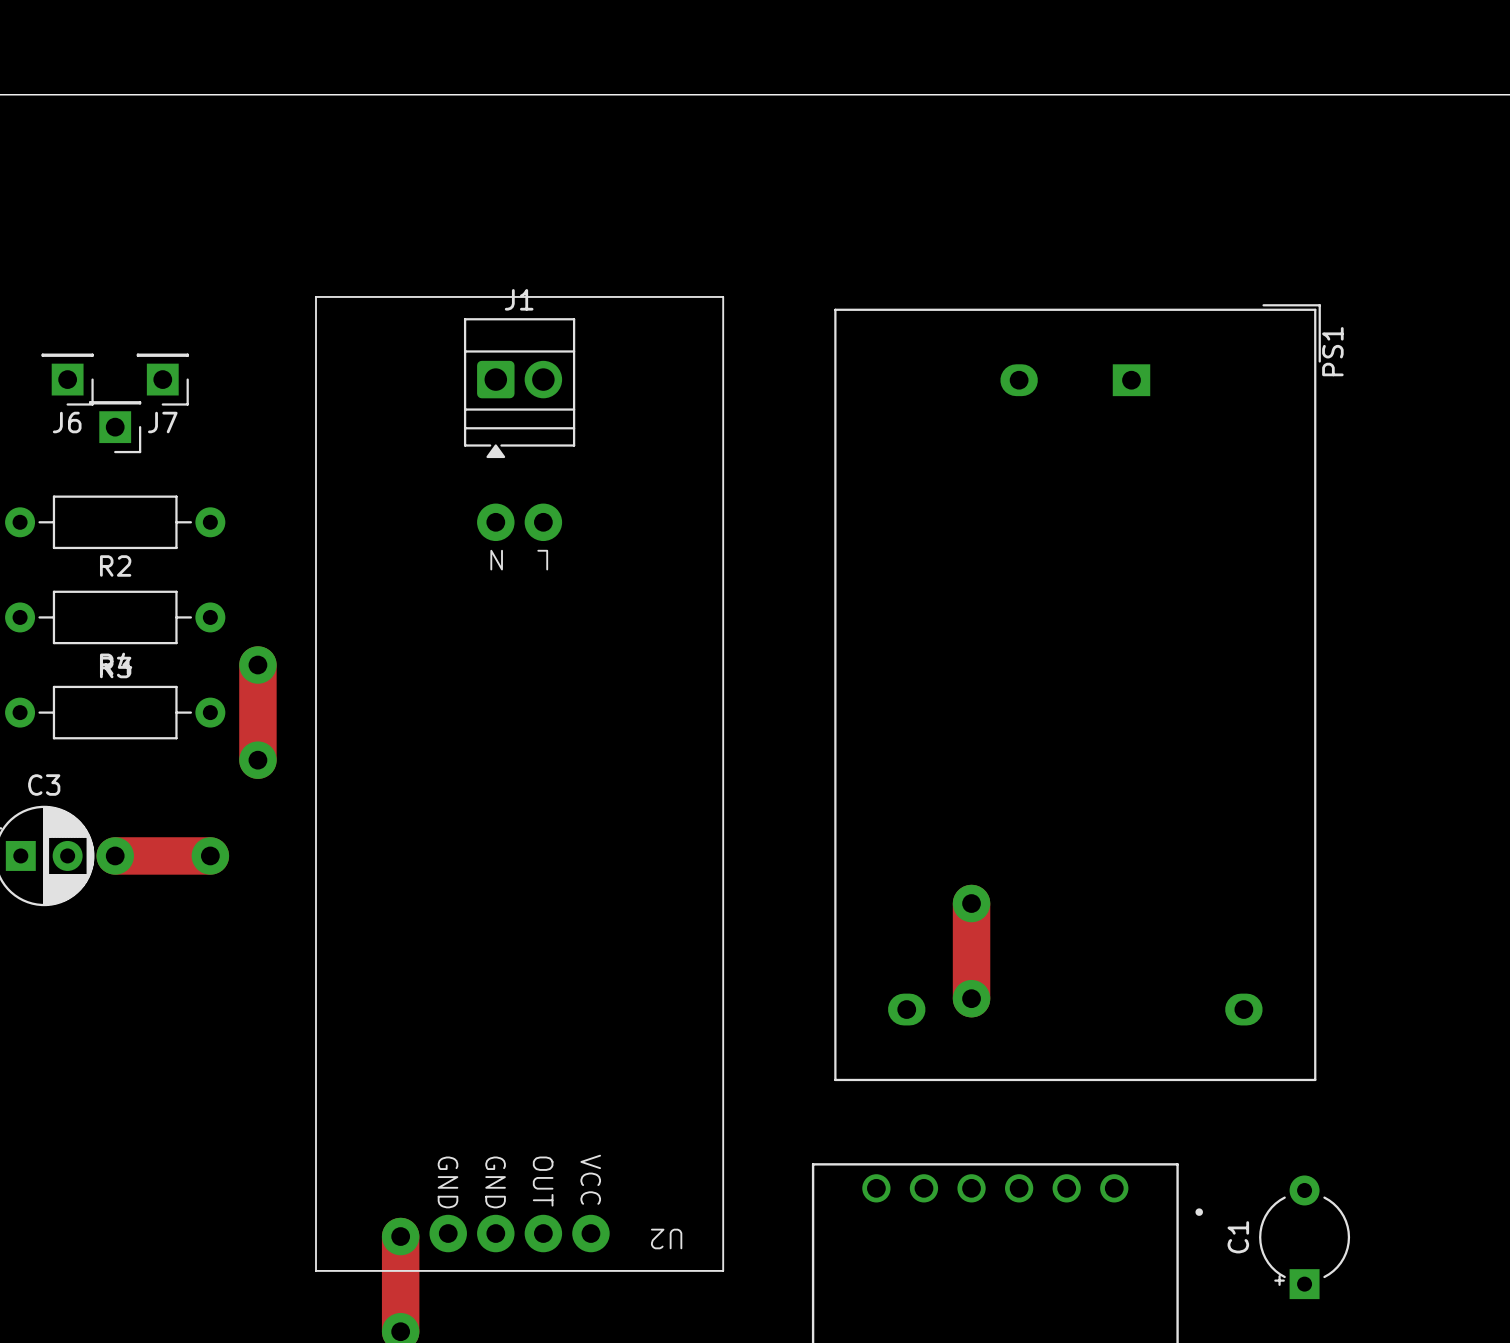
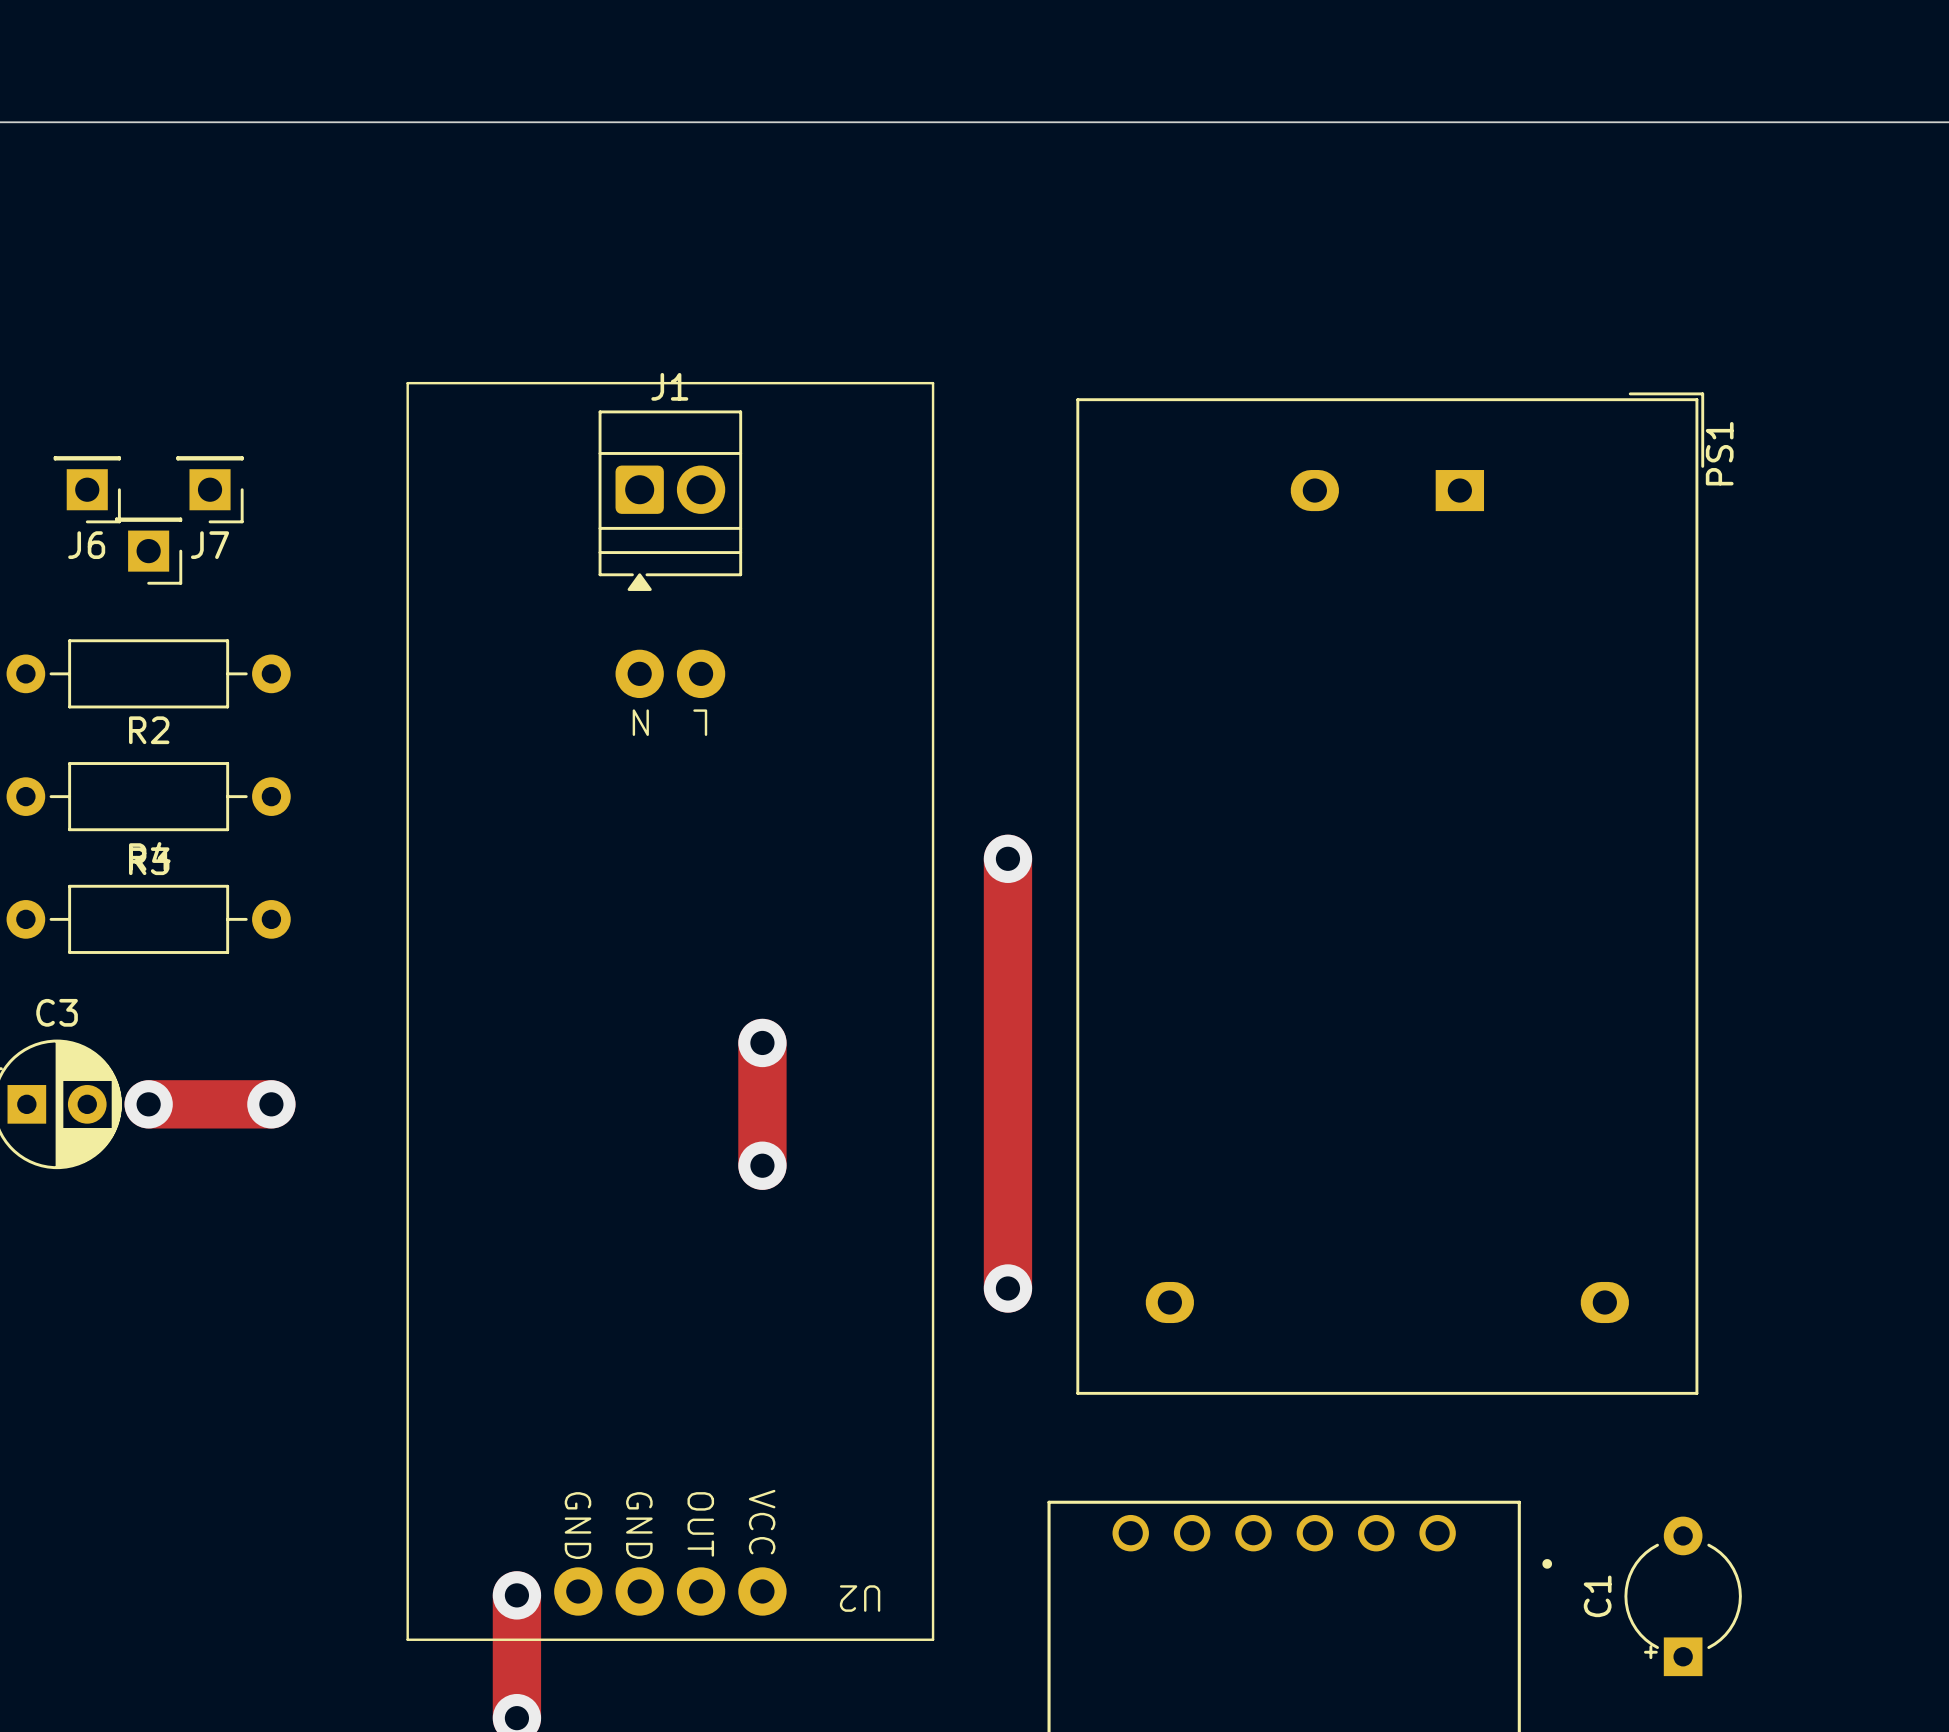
track: (257, 665) (257, 760) -> (762, 1042) (762, 1165)
via: (257, 665) -> none
track: none -> (1007, 858) (1007, 1288)
via: none -> (1007, 858)
via: (257, 760) -> none
via: none -> (762, 1042)
via: none -> (762, 1165)
track: (971, 903) (971, 998) -> none
via: (971, 903) -> none
via: none -> (1007, 1288)
via: (971, 998) -> none

